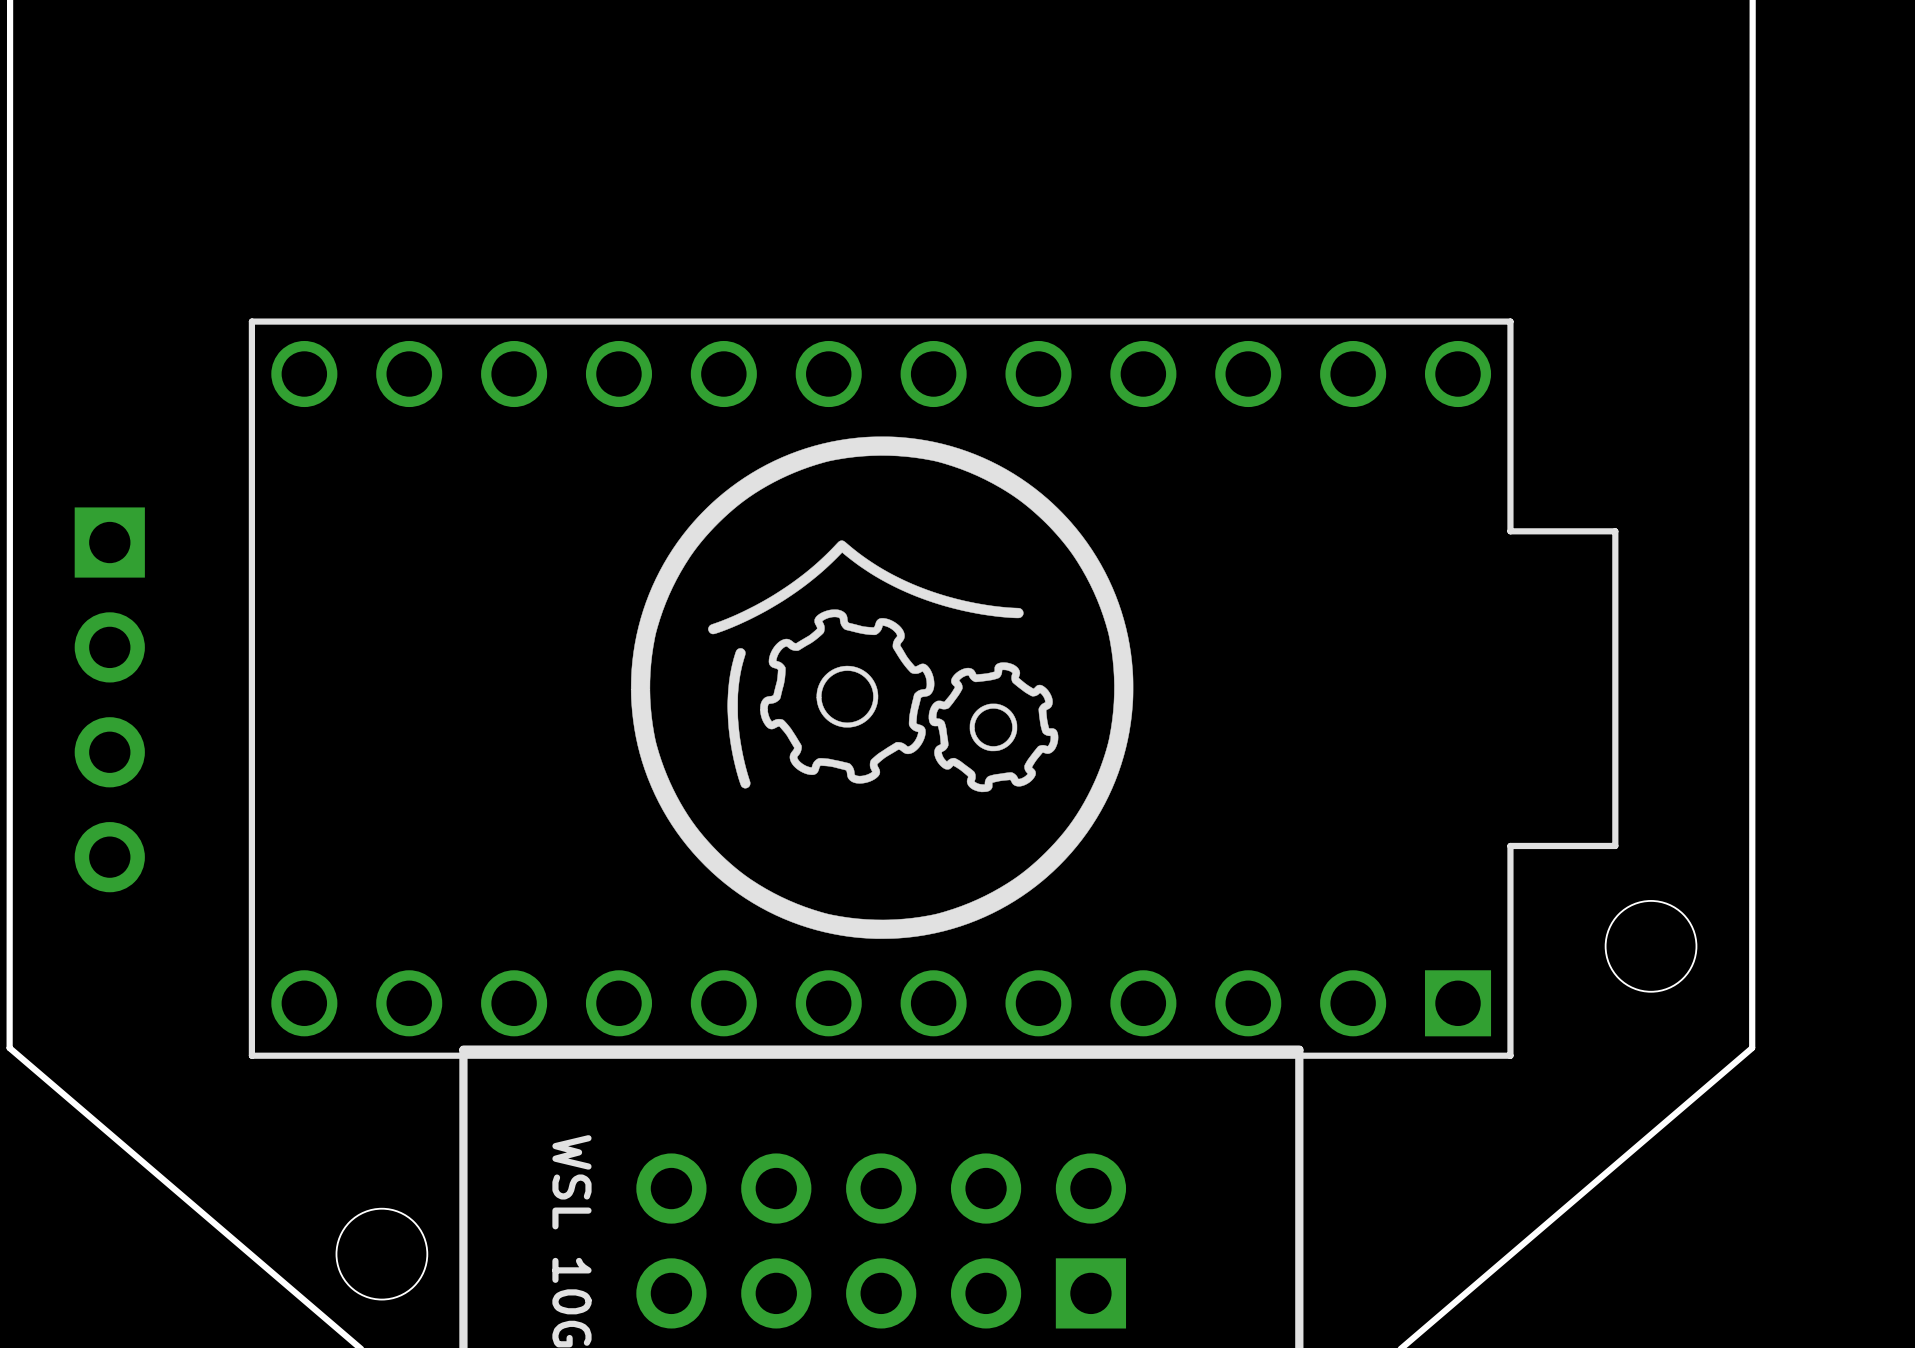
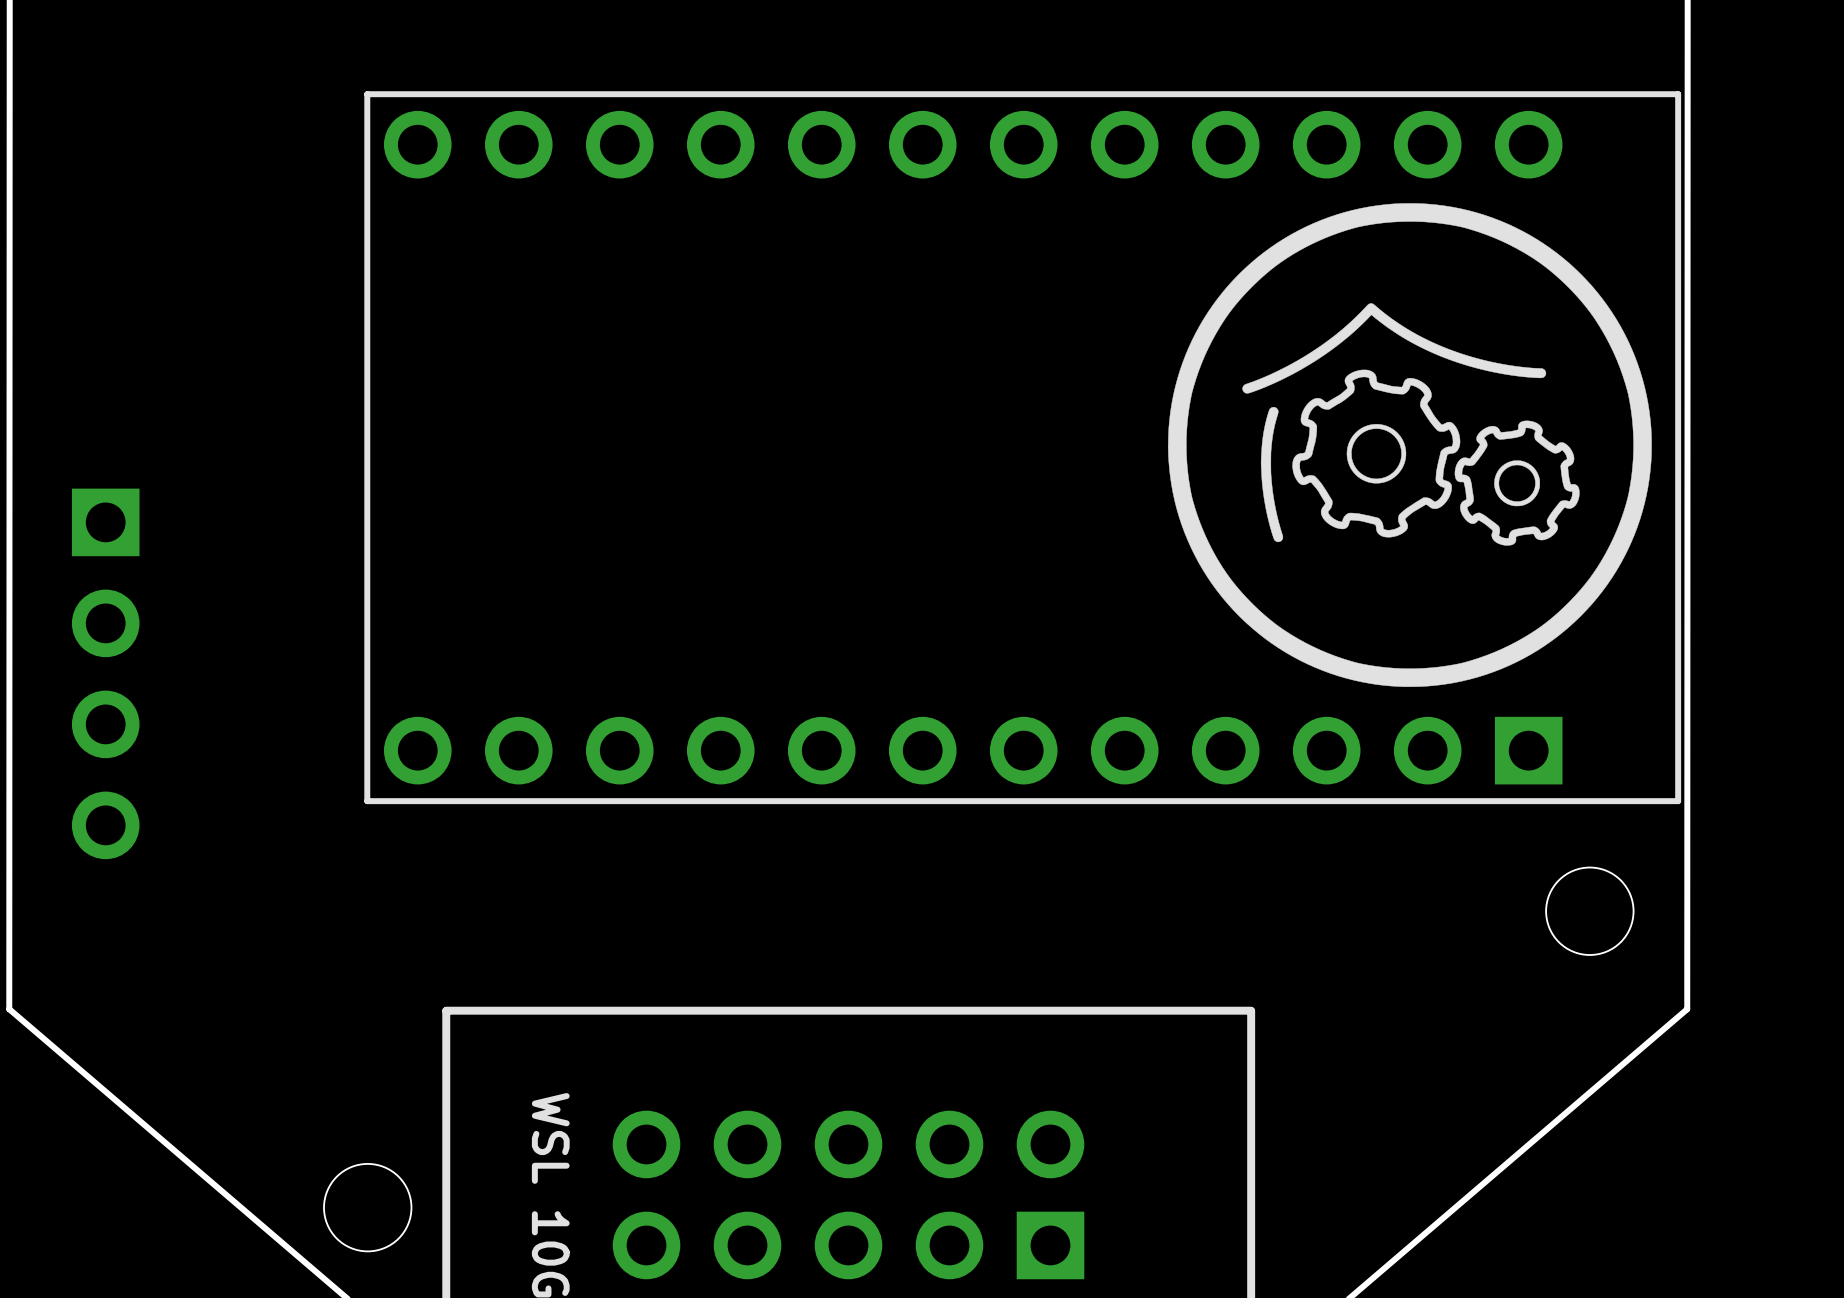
part: none -> (1022, 447)
drawing position: (882, 687) -> (1409, 445)
part: (933, 688) -> none

